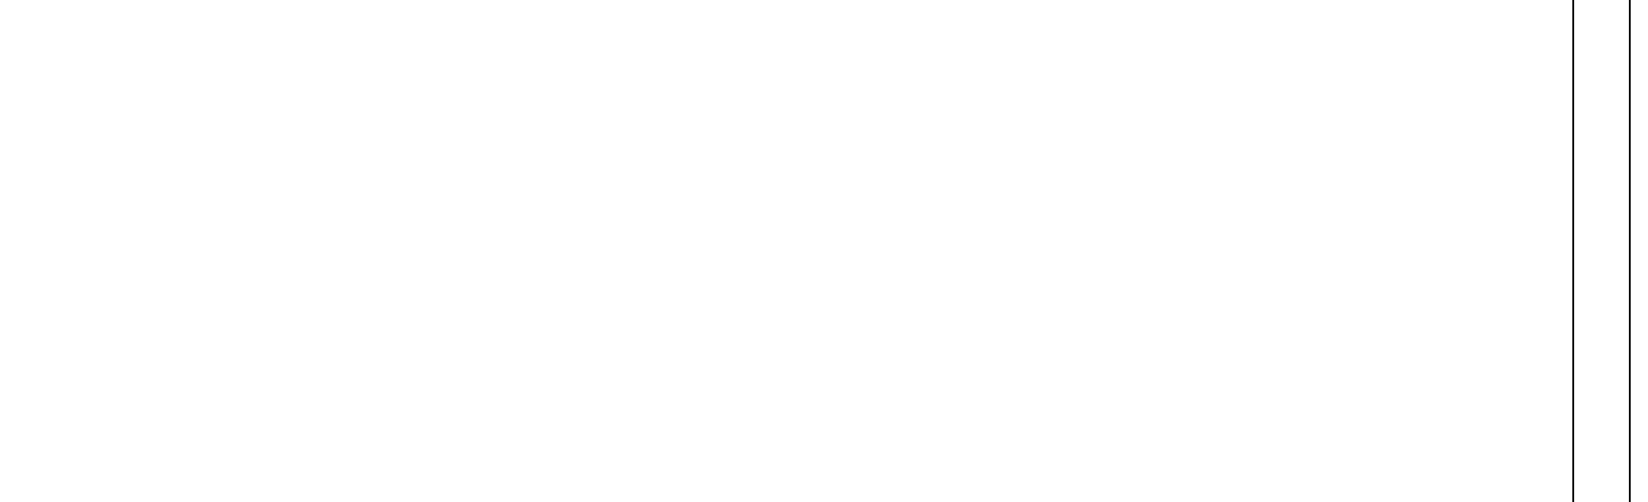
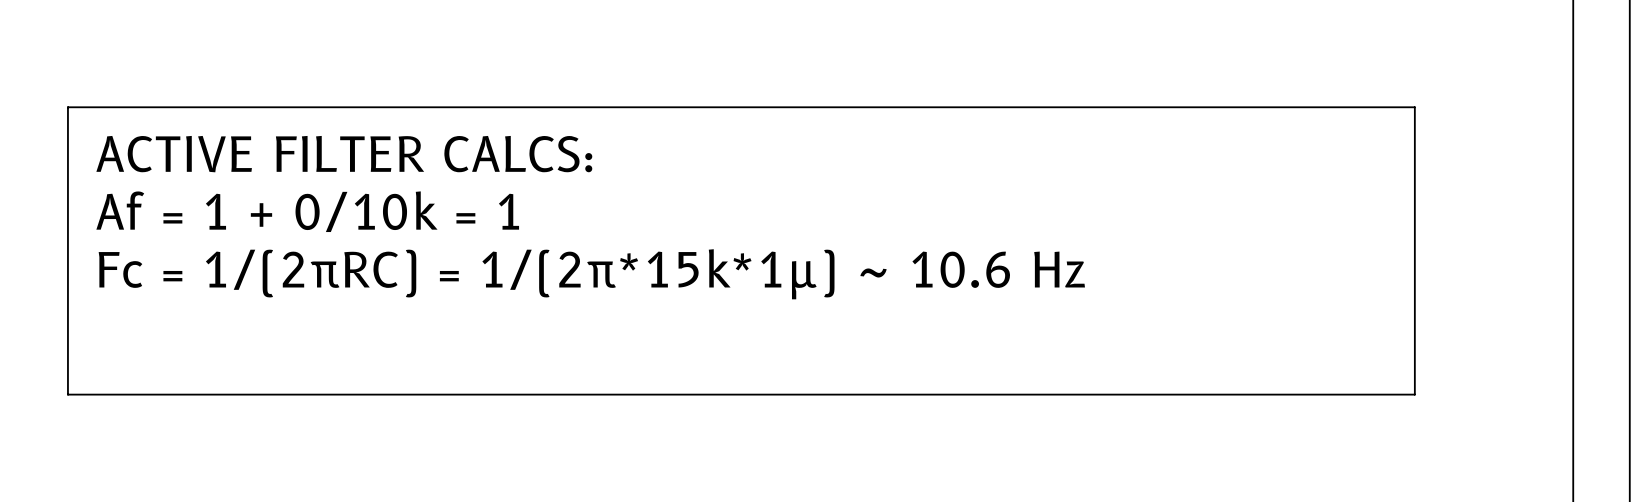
line: none -> (67, 107) (1414, 107) (1414, 394) (67, 394) (67, 107)
text: none -> ACTIVE FILTER CALCS: (344, 154)
text: none -> Af = 1 + 0/10k = 1 (307, 211)
text: none -> Fc = 1/(2πRC) = 1/(2π*15k*1µ) ~ 10.6 Hz (591, 274)

